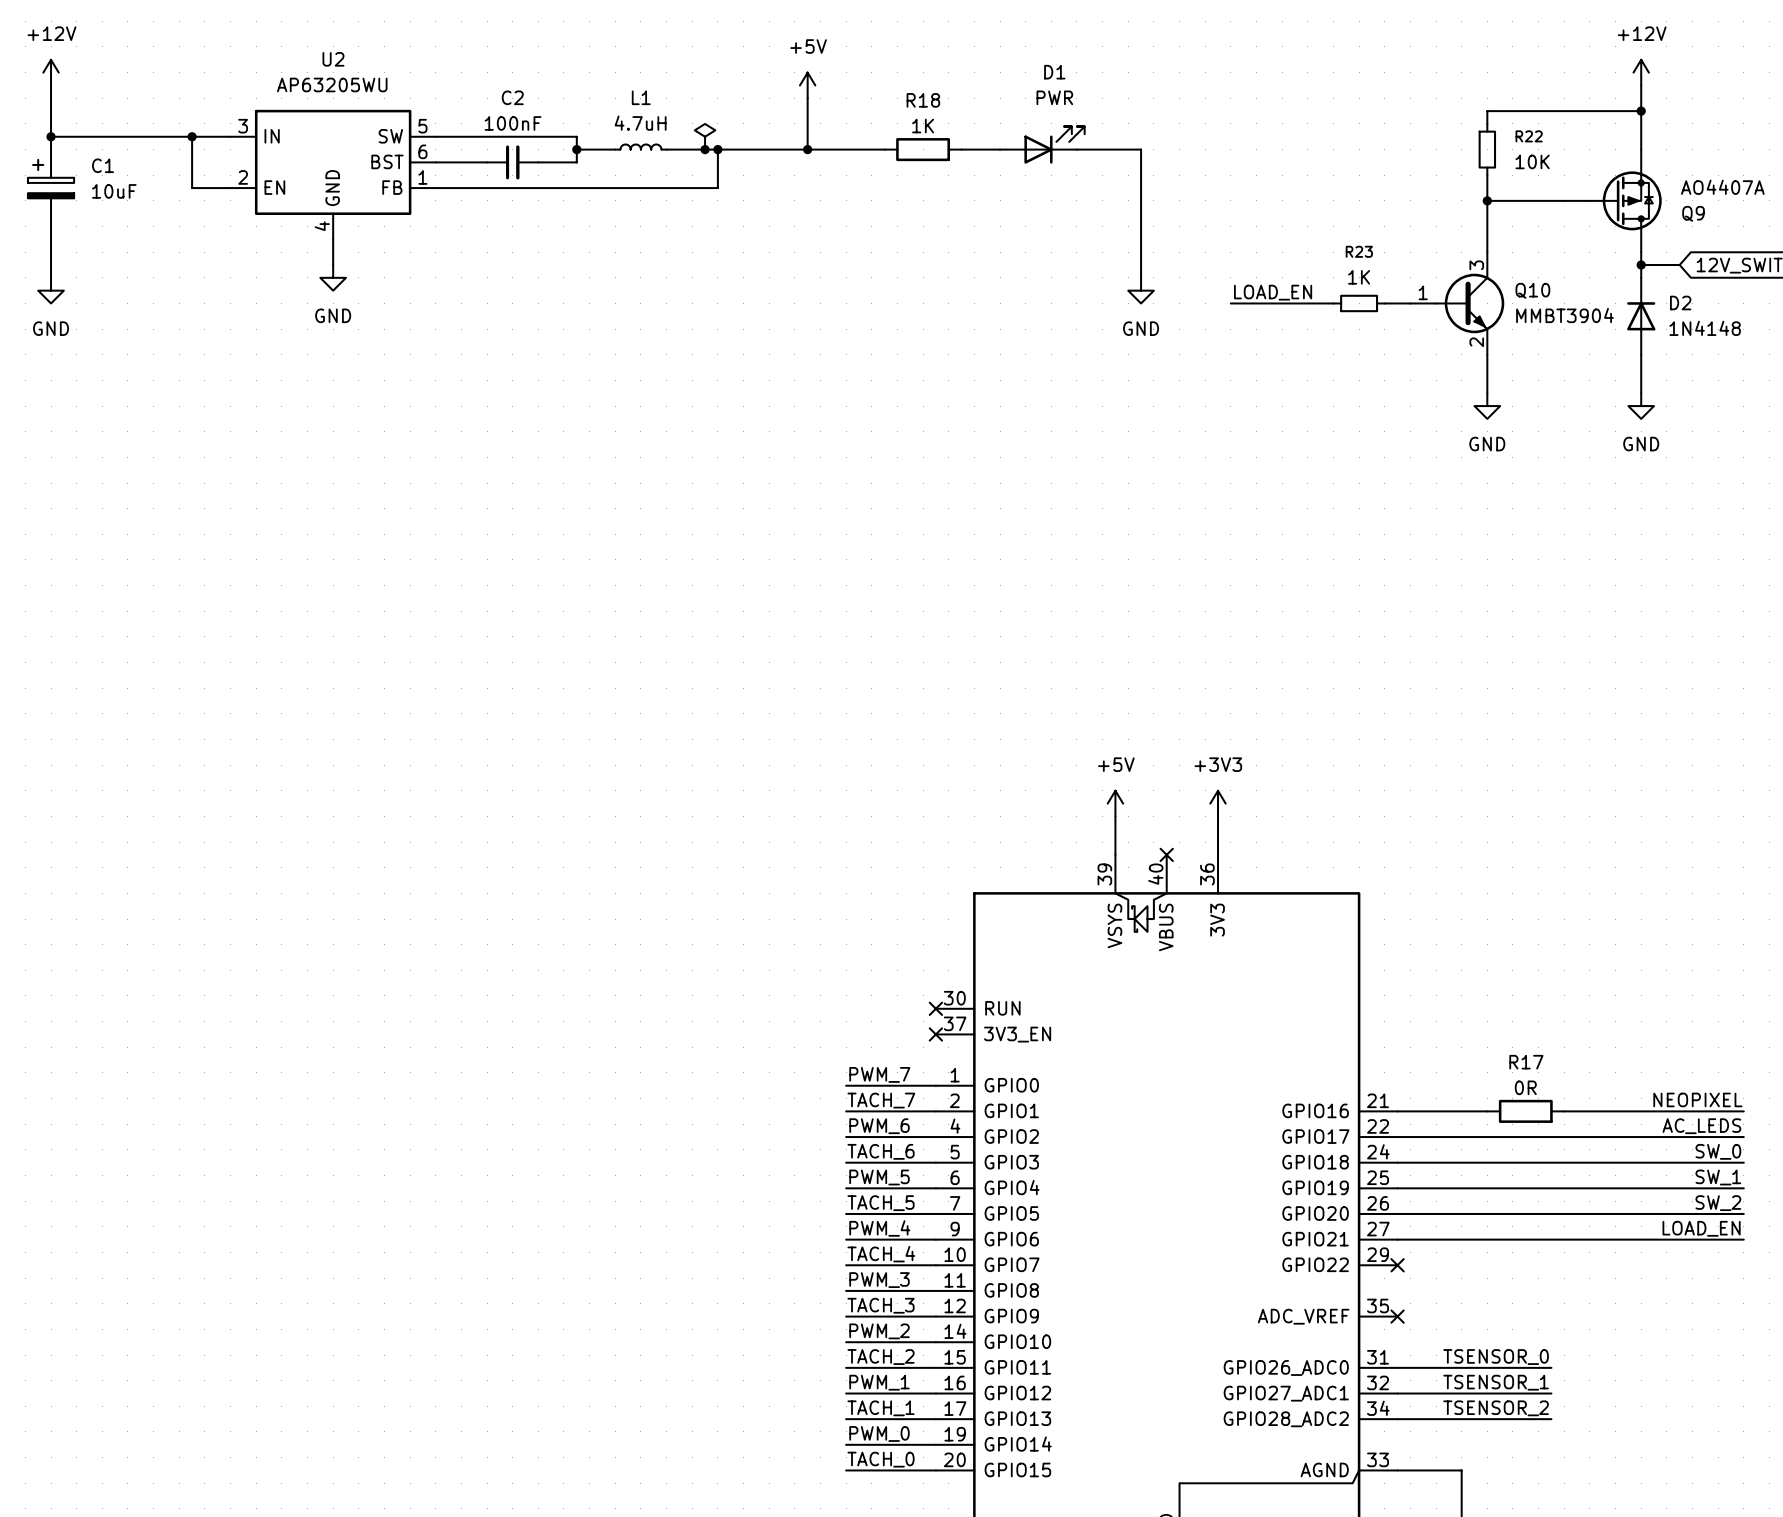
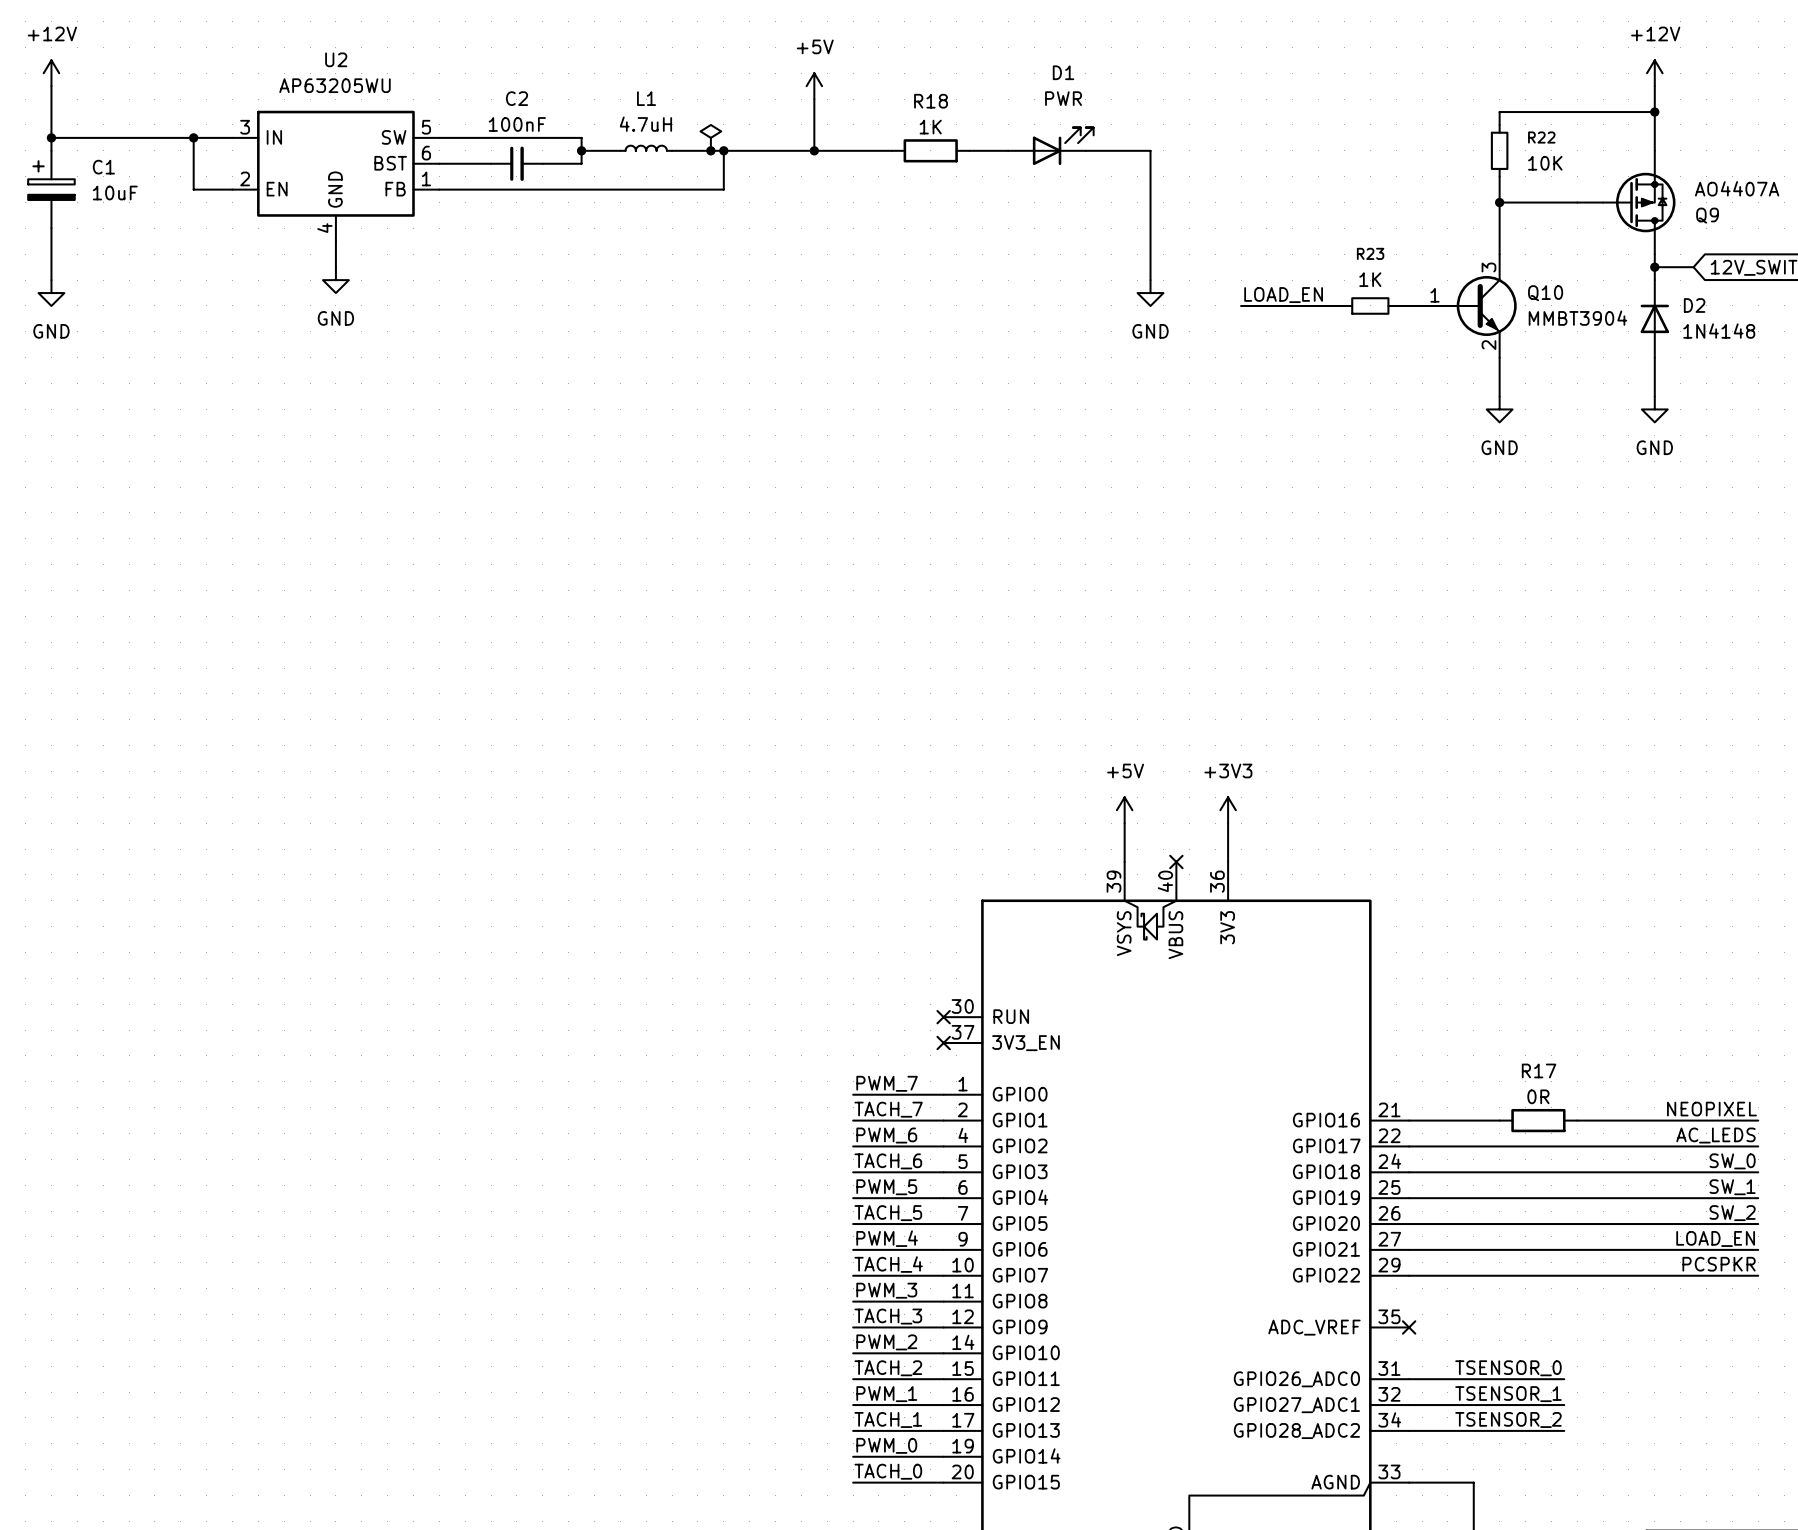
label: none -> PCSPKR (1719, 1264)
wire: none -> (1409, 1275) (1758, 1275)
no-connect mark: (1397, 1265) -> none

